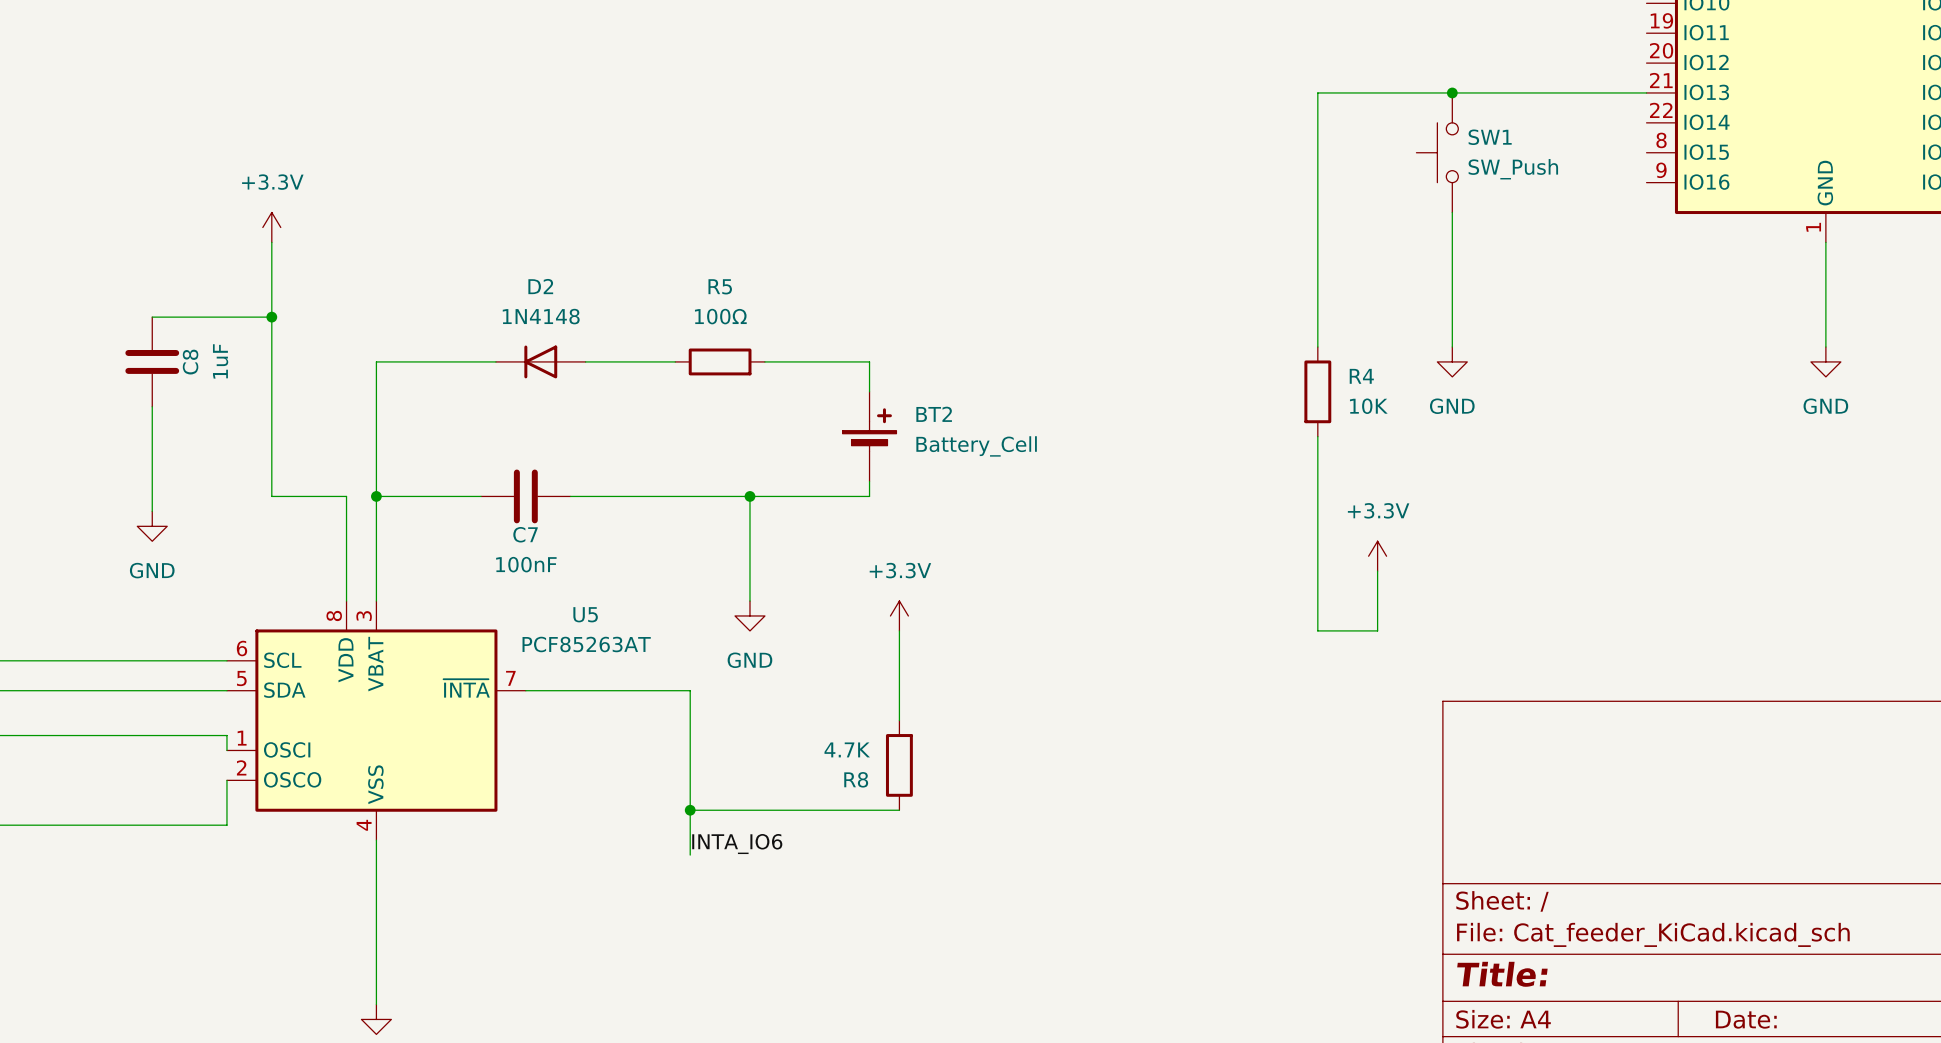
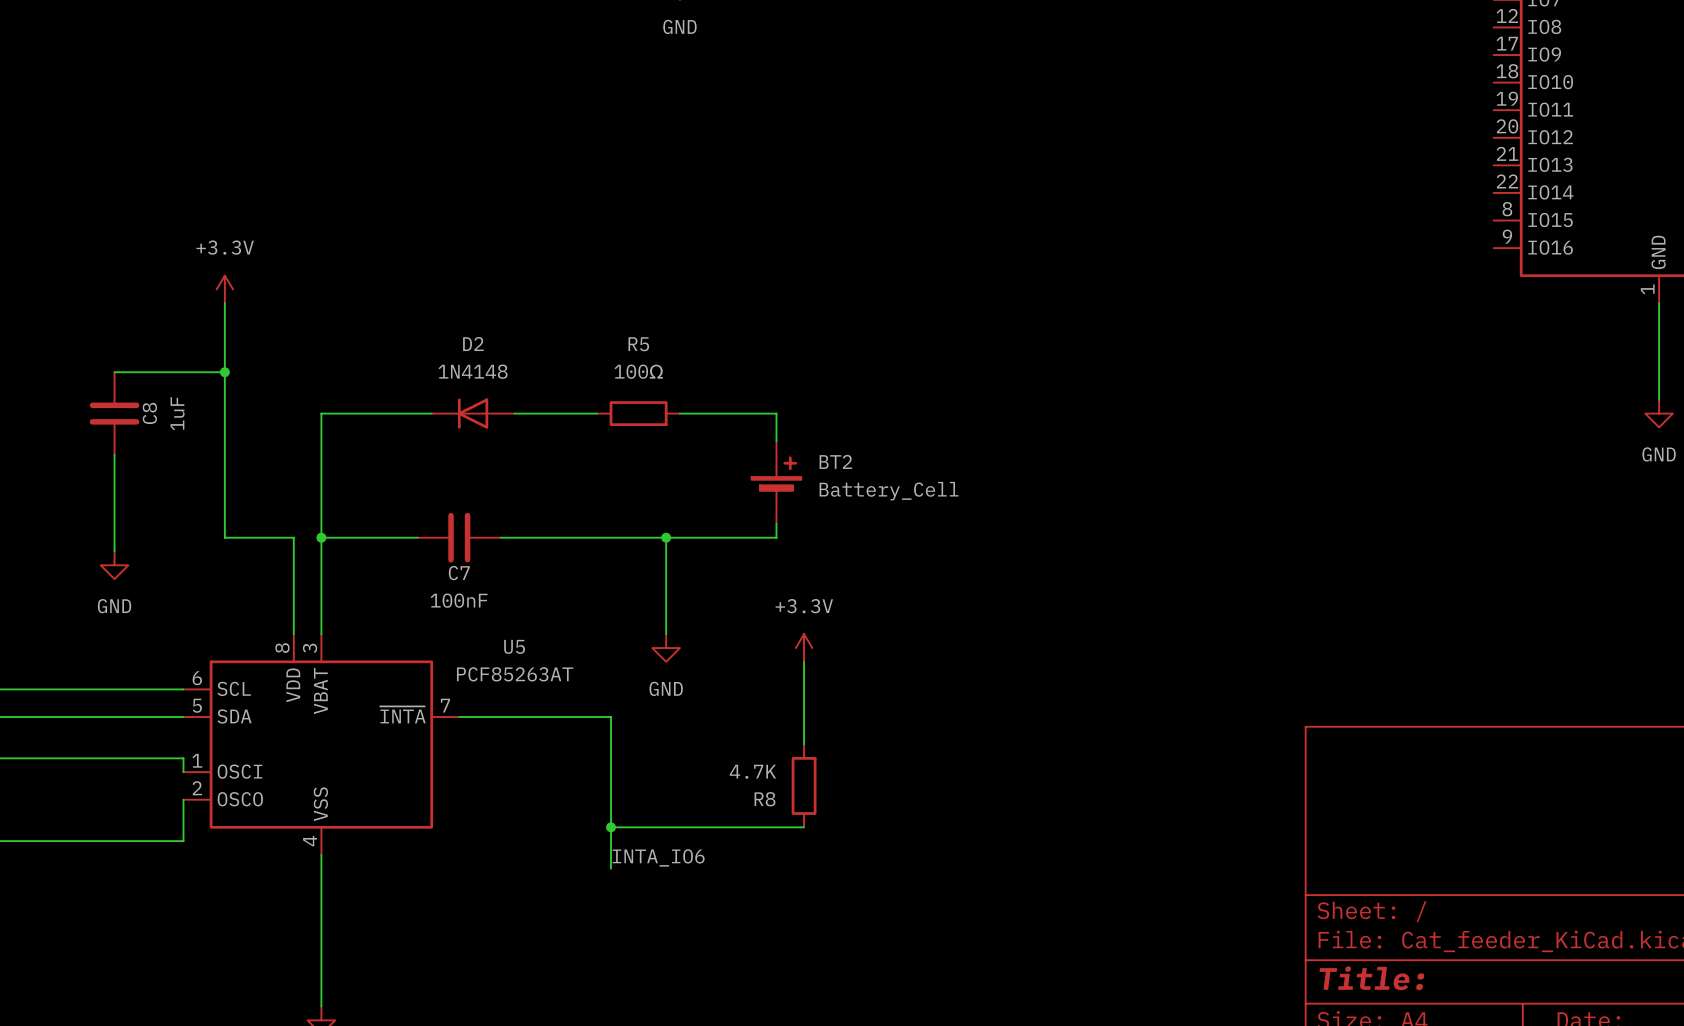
junction: (1452, 92) -> none
wire: (1646, 92) (1317, 92) (1317, 347) -> none
SW1: SW_Push (1437, 152) -> none
wire: (1452, 212) (1452, 347) -> none
power symbol: GND (1452, 361) -> none
R4: 10K (1317, 391) -> none
wire: (1317, 436) (1317, 630) (1377, 630) (1377, 571) -> none
power symbol: +3.3V (1377, 556) -> none

